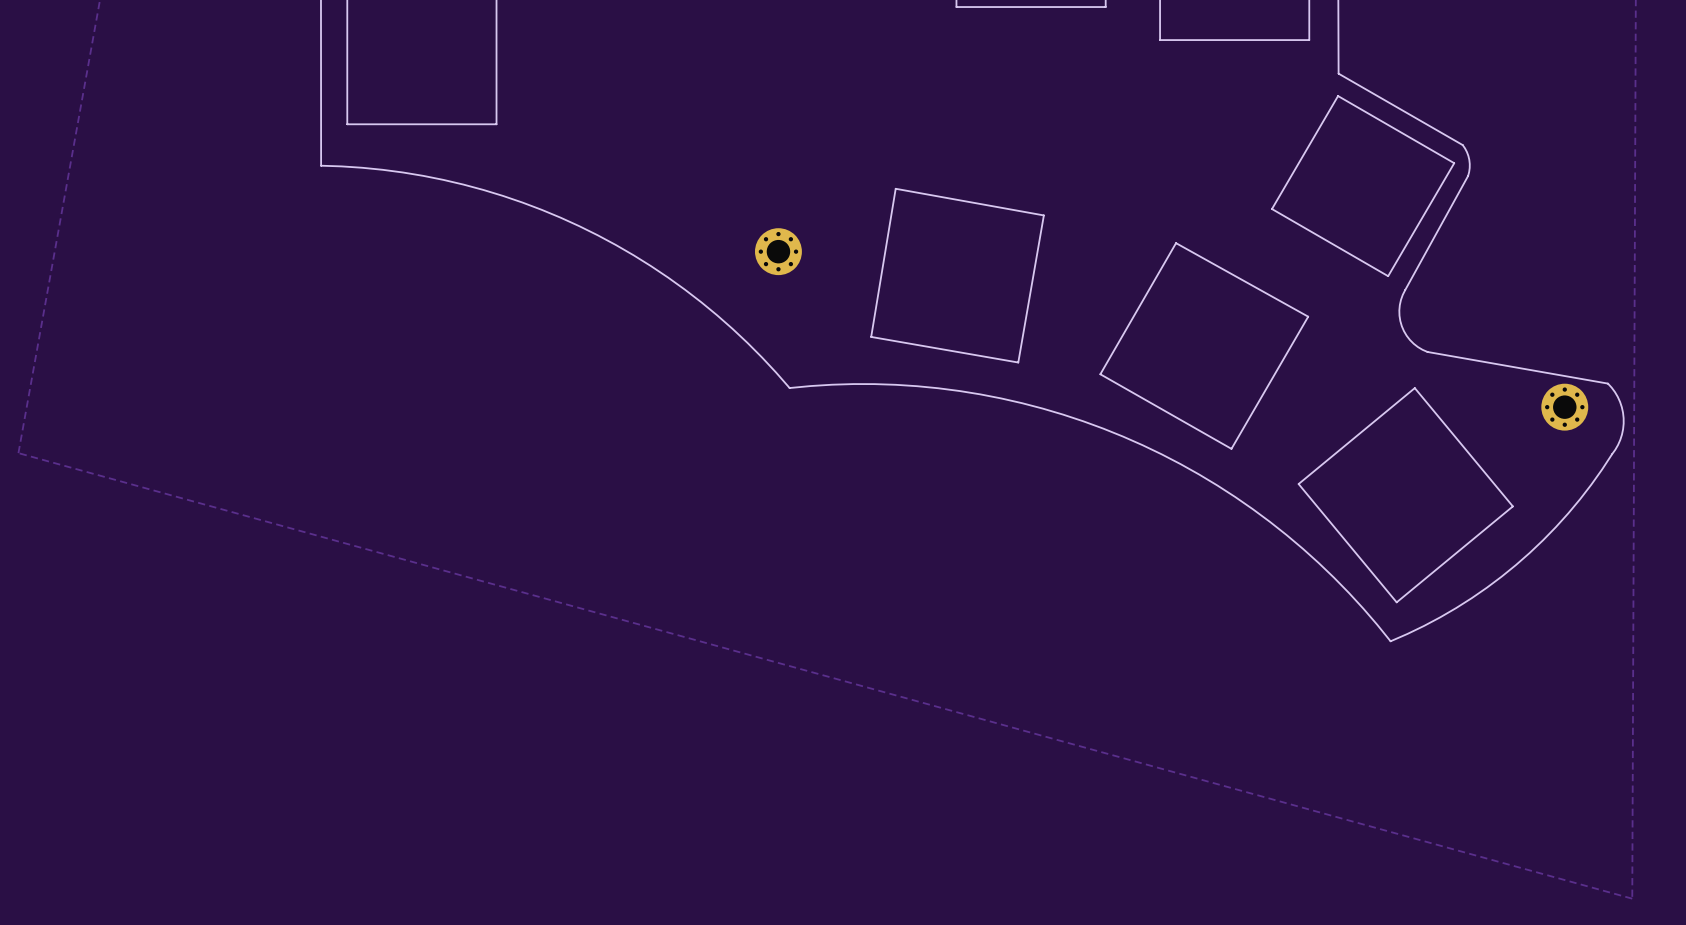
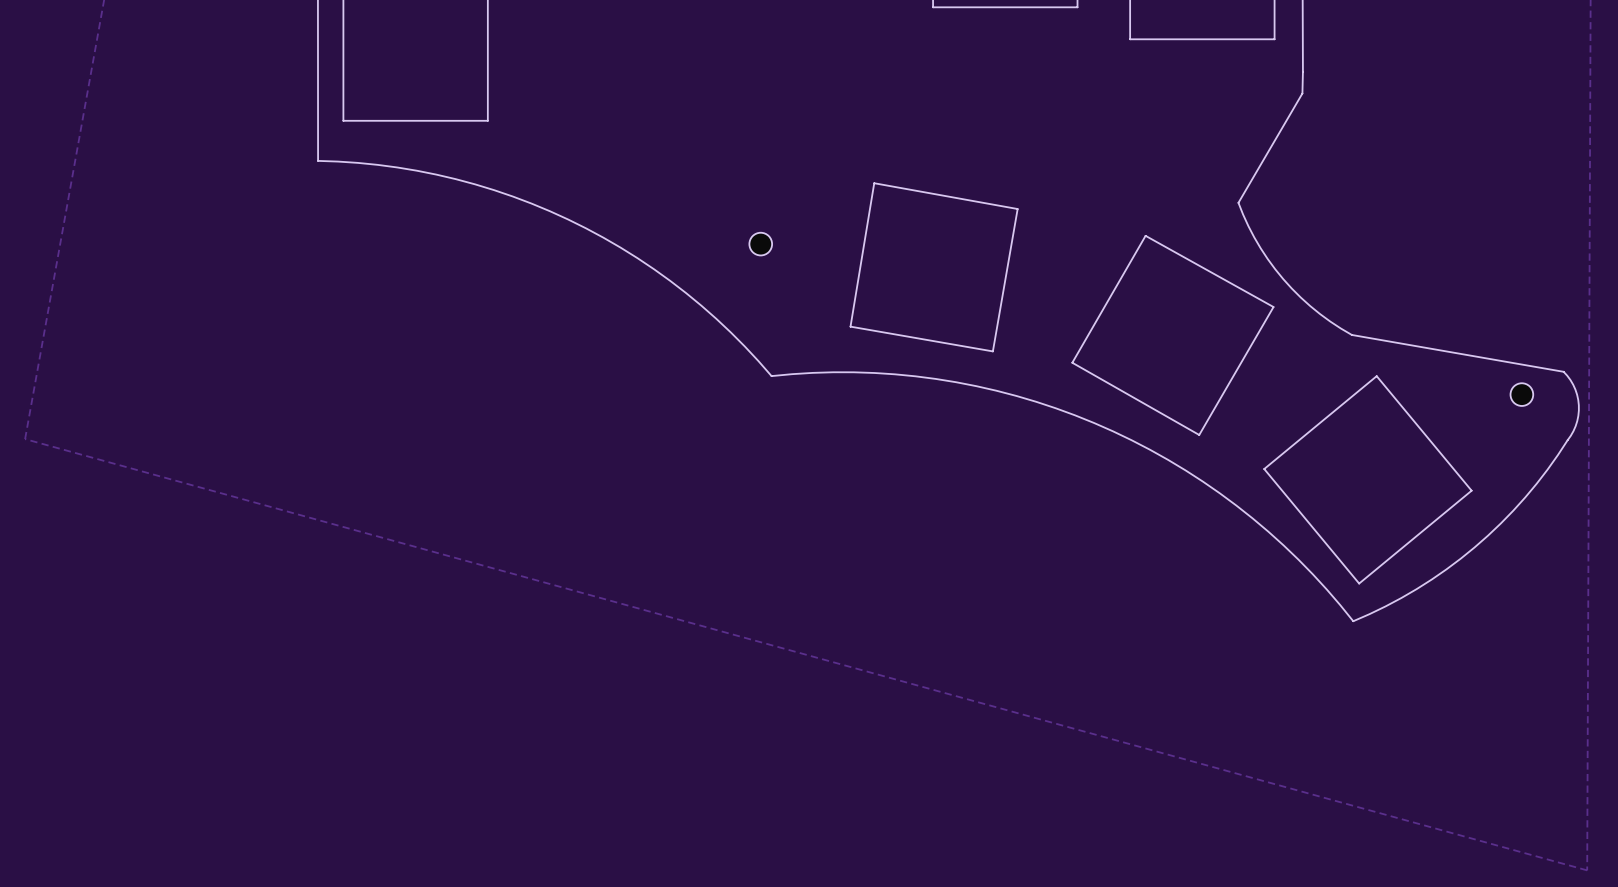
board edge: (1338, 73) (1462, 145) (1468, 155) (1468, 175) (1400, 299) (1400, 321) (1409, 339) (1427, 351) (1607, 383) -> (1238, 202) (1260, 248) (1283, 279) (1310, 306) (1351, 334) (1563, 371)
board edge: (1338, 96) (1454, 163) (1388, 276) (1271, 209) -> (1302, 93) (1302, 71)
part footprint: [755, 228, 802, 276] -> [749, 232, 773, 256]
part footprint: [1541, 383, 1589, 431] -> [1510, 383, 1534, 406]

